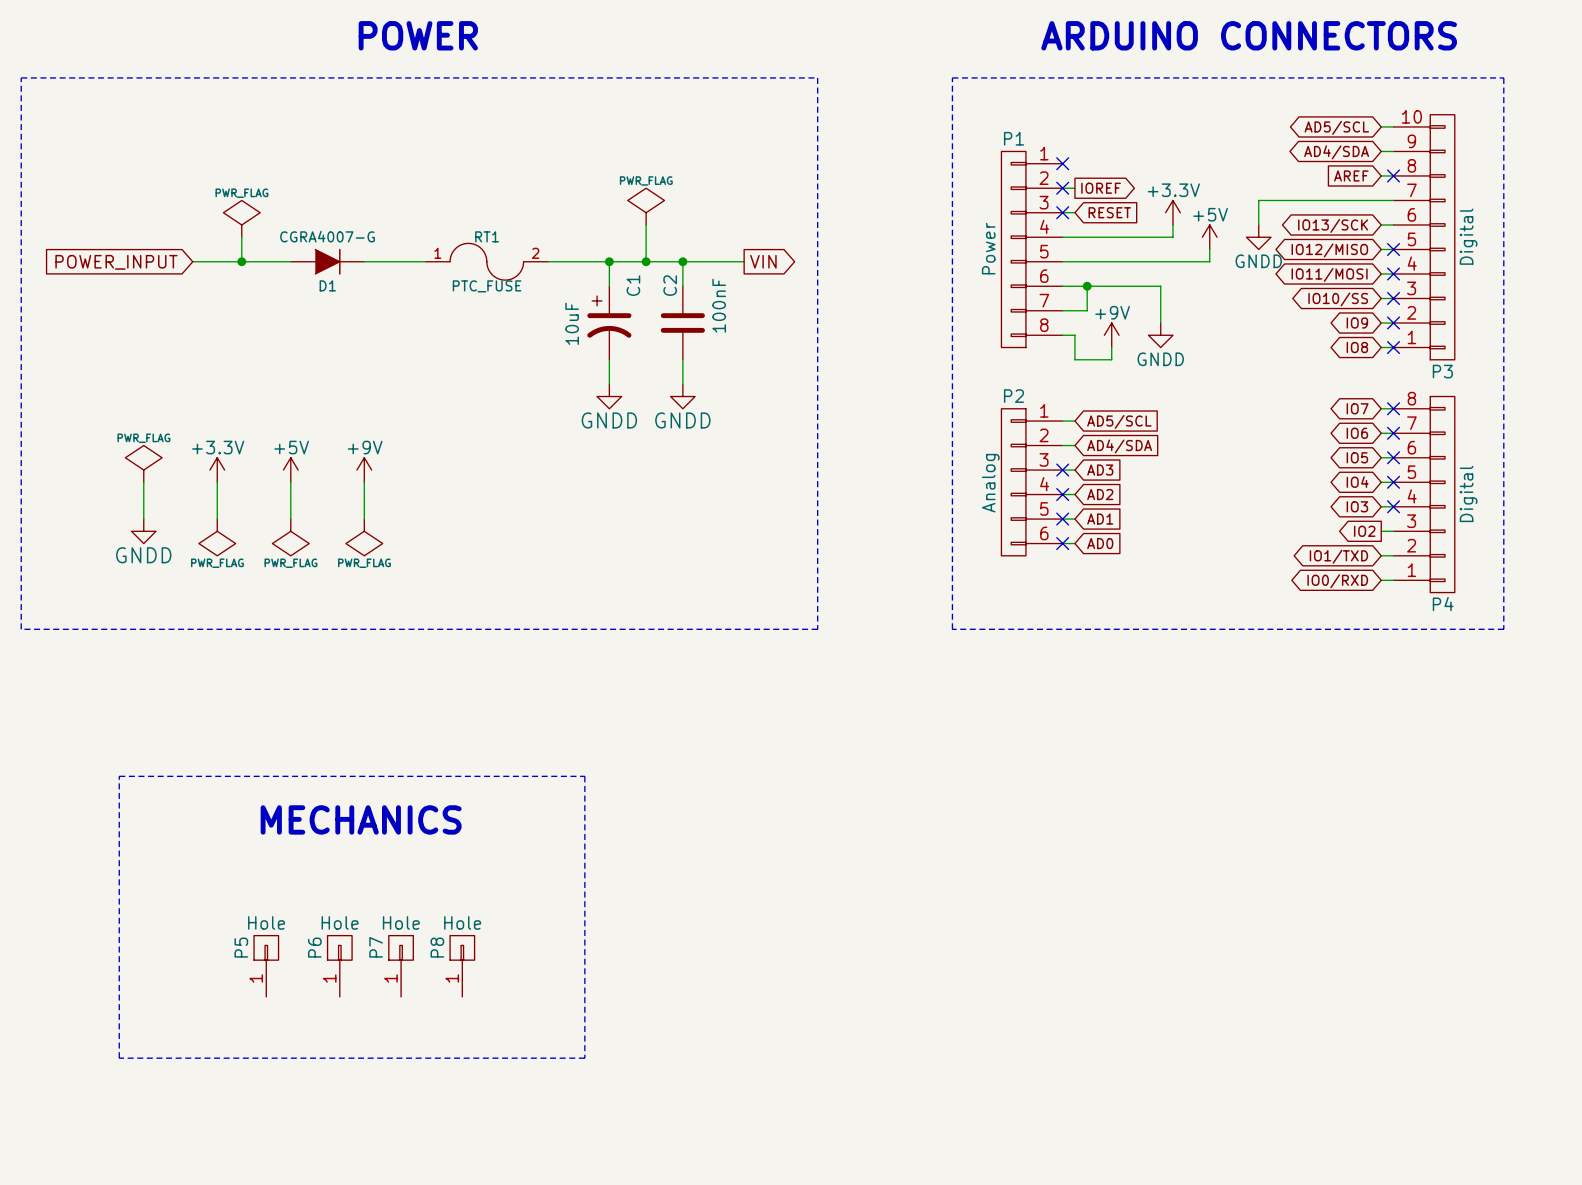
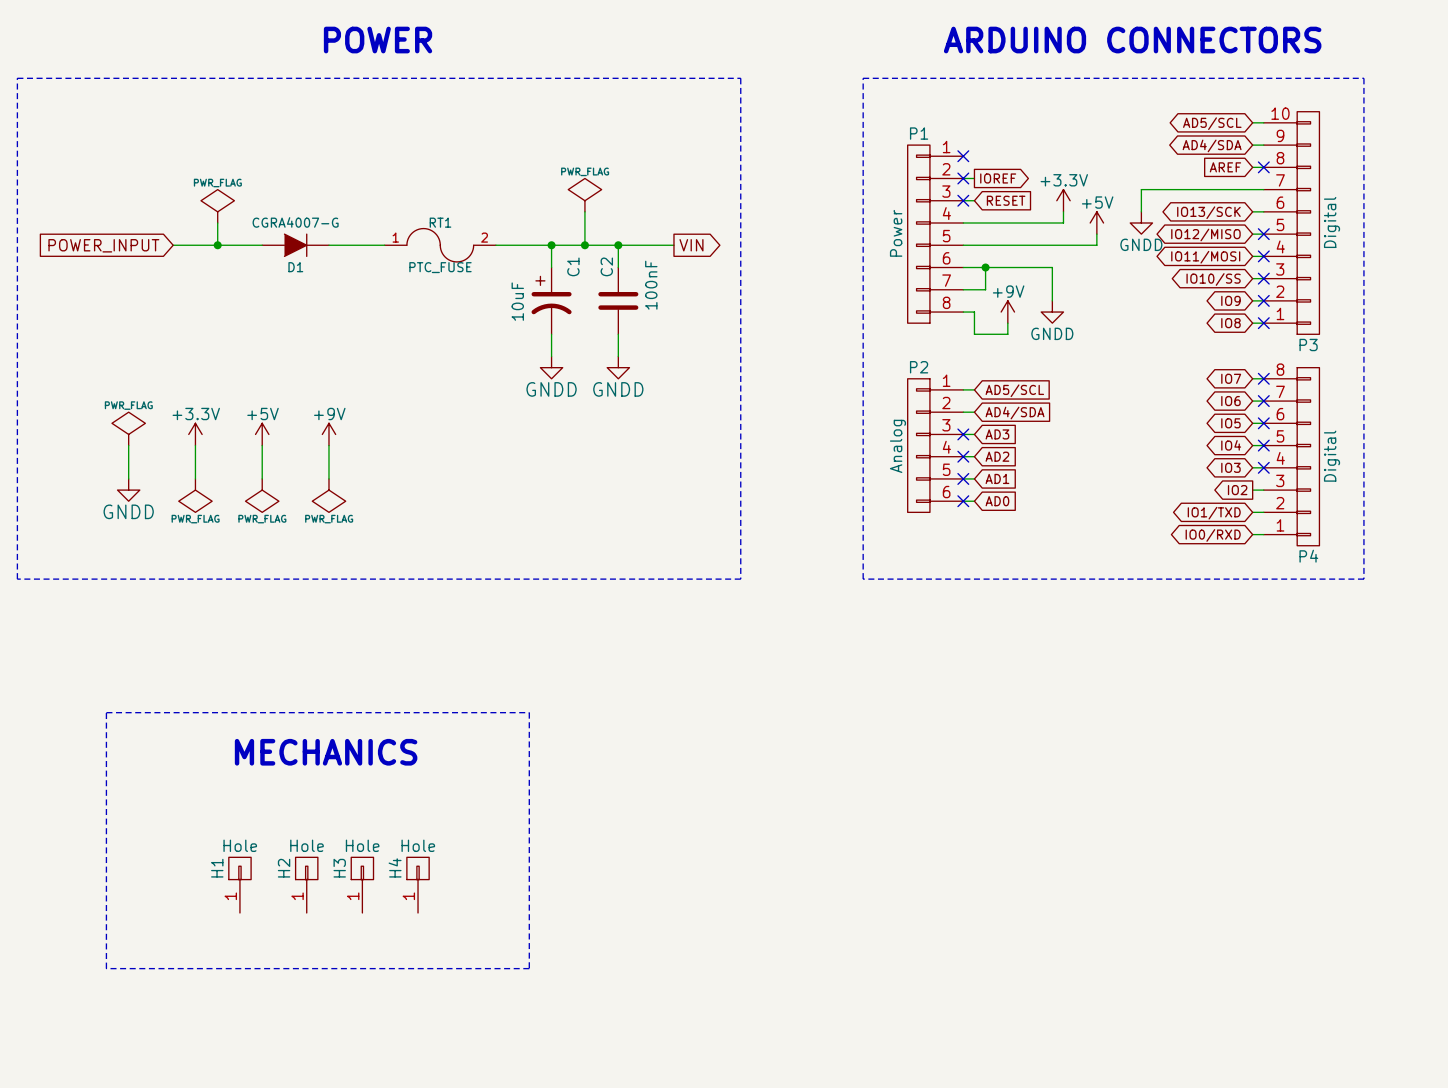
P5 name: P5 (241, 947) -> H1 (217, 868)
P6 name: P6 (314, 947) -> H2 (284, 868)
P7 name: P7 (376, 947) -> H3 (339, 868)
P8 name: P8 (437, 947) -> H4 (395, 867)

